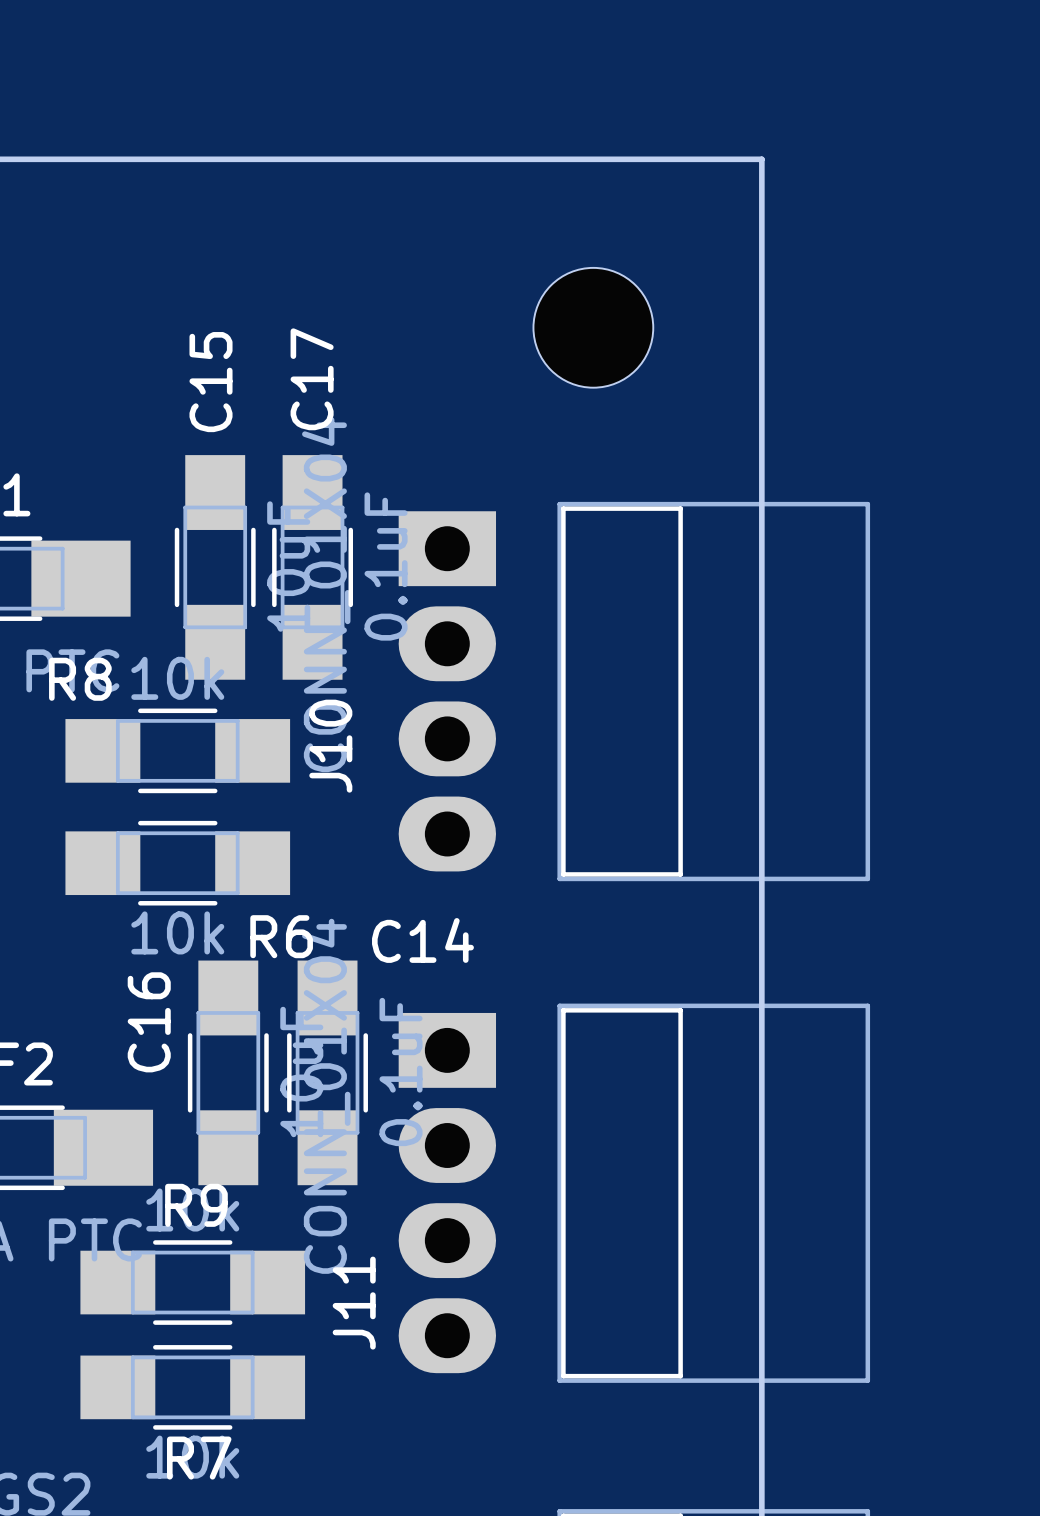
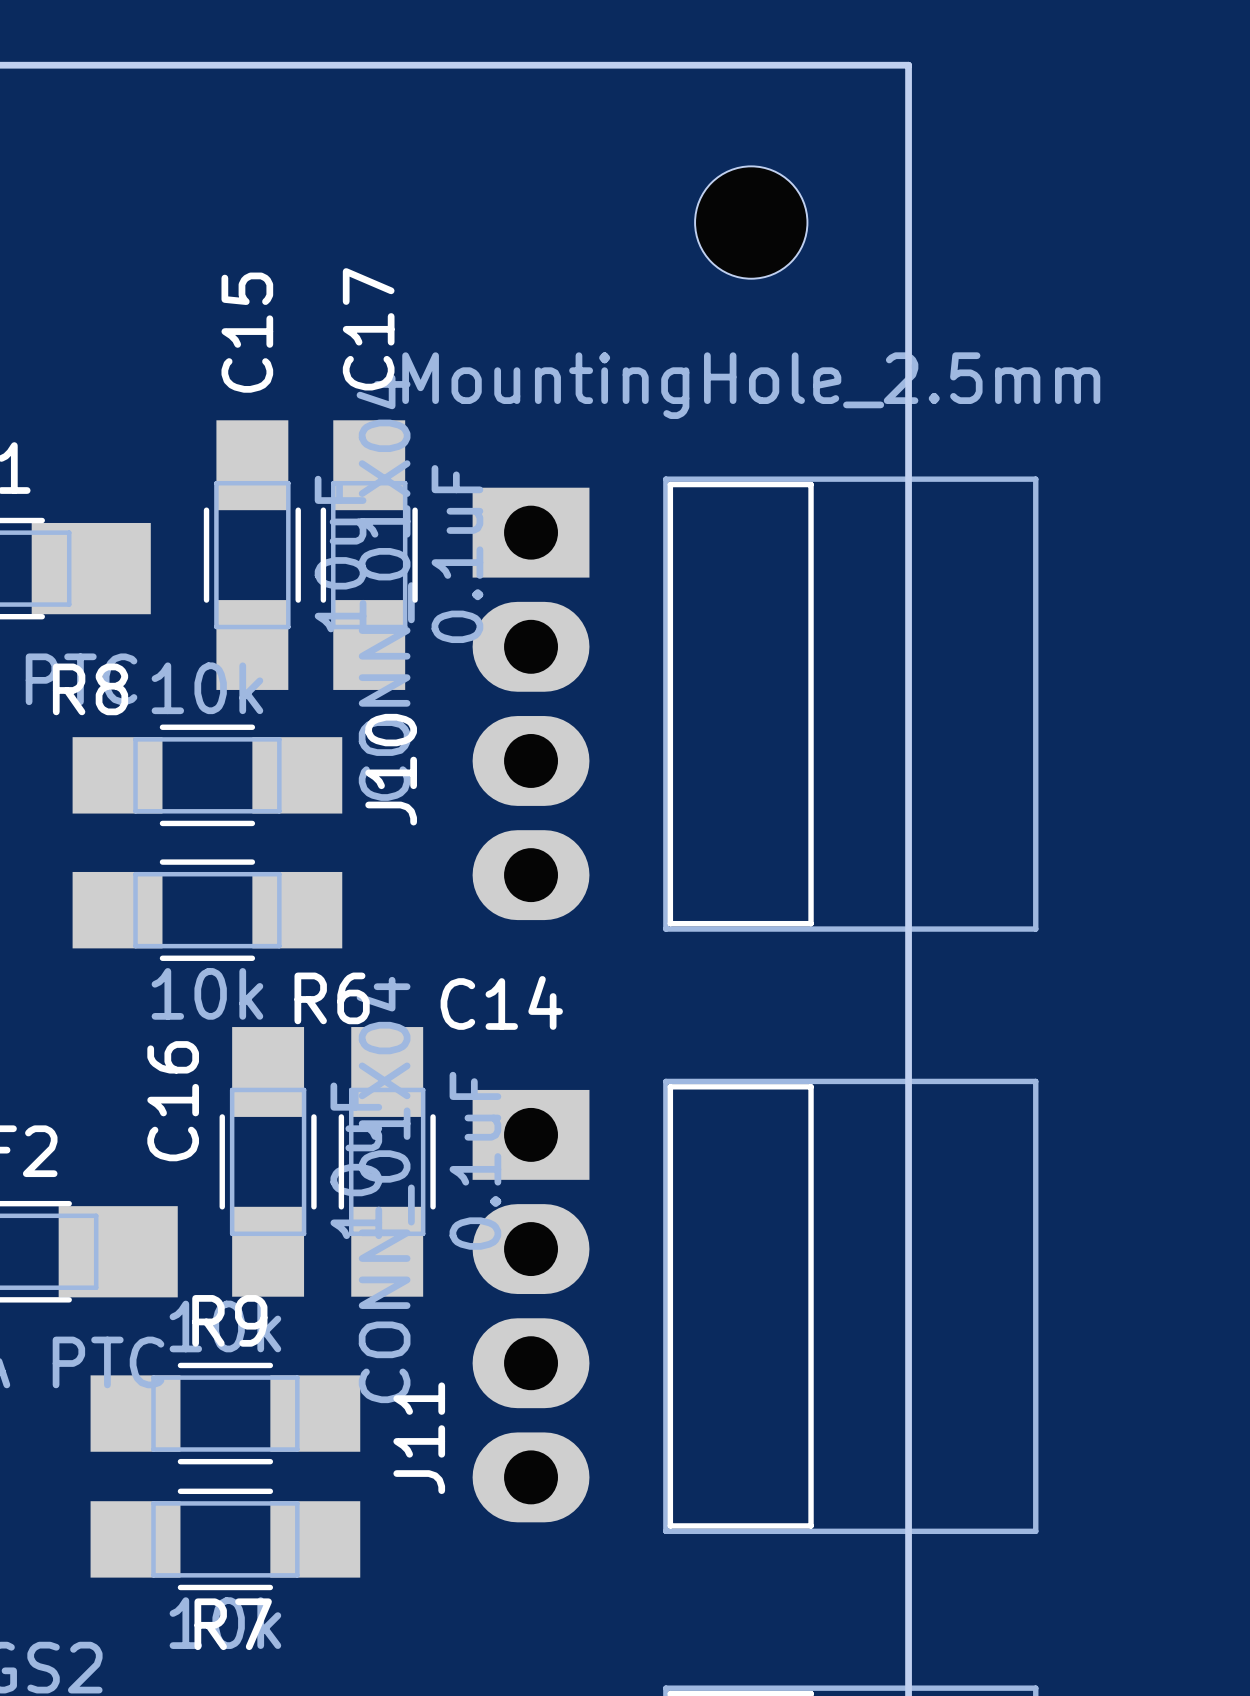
part: none -> MountingHole_2.5mm (751, 222)
part: (593, 327) -> none

